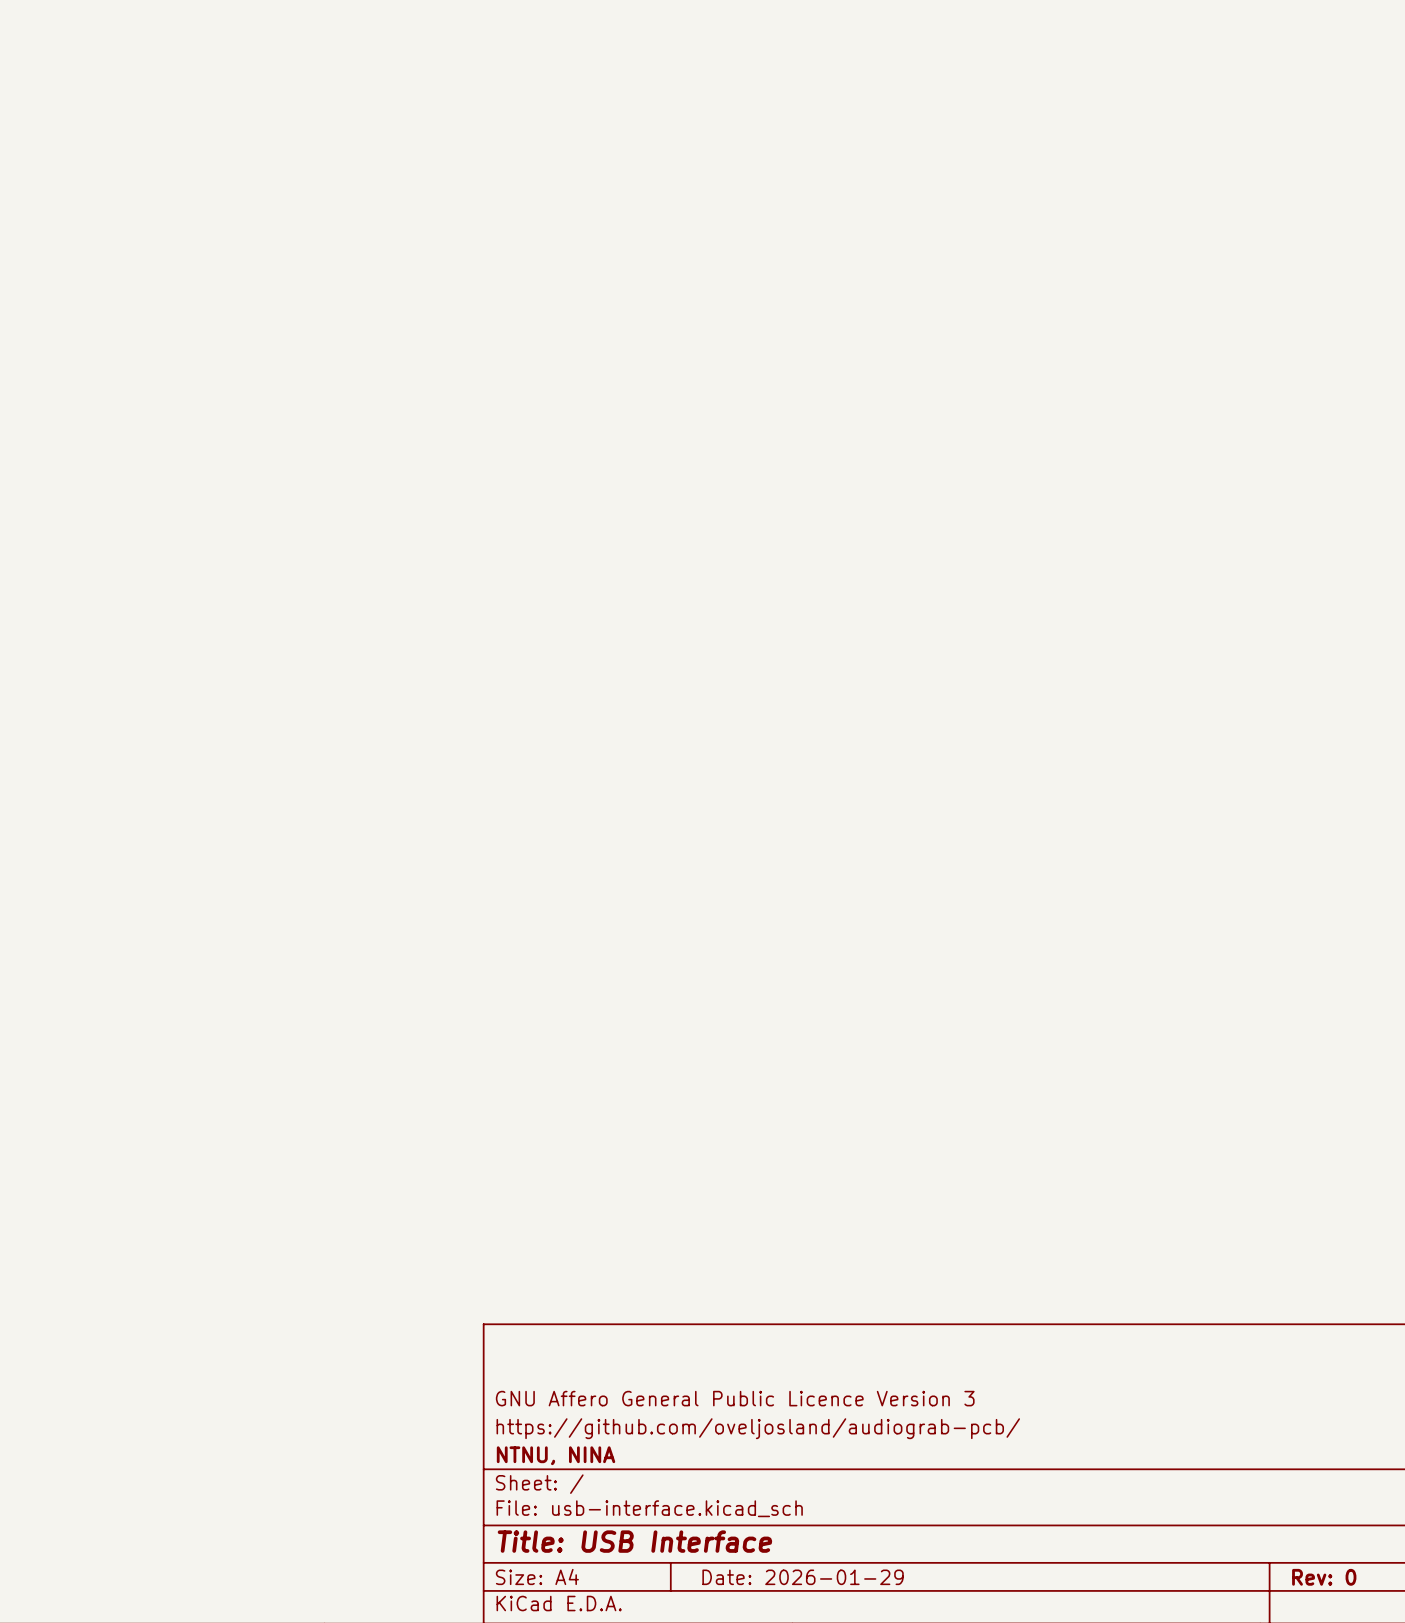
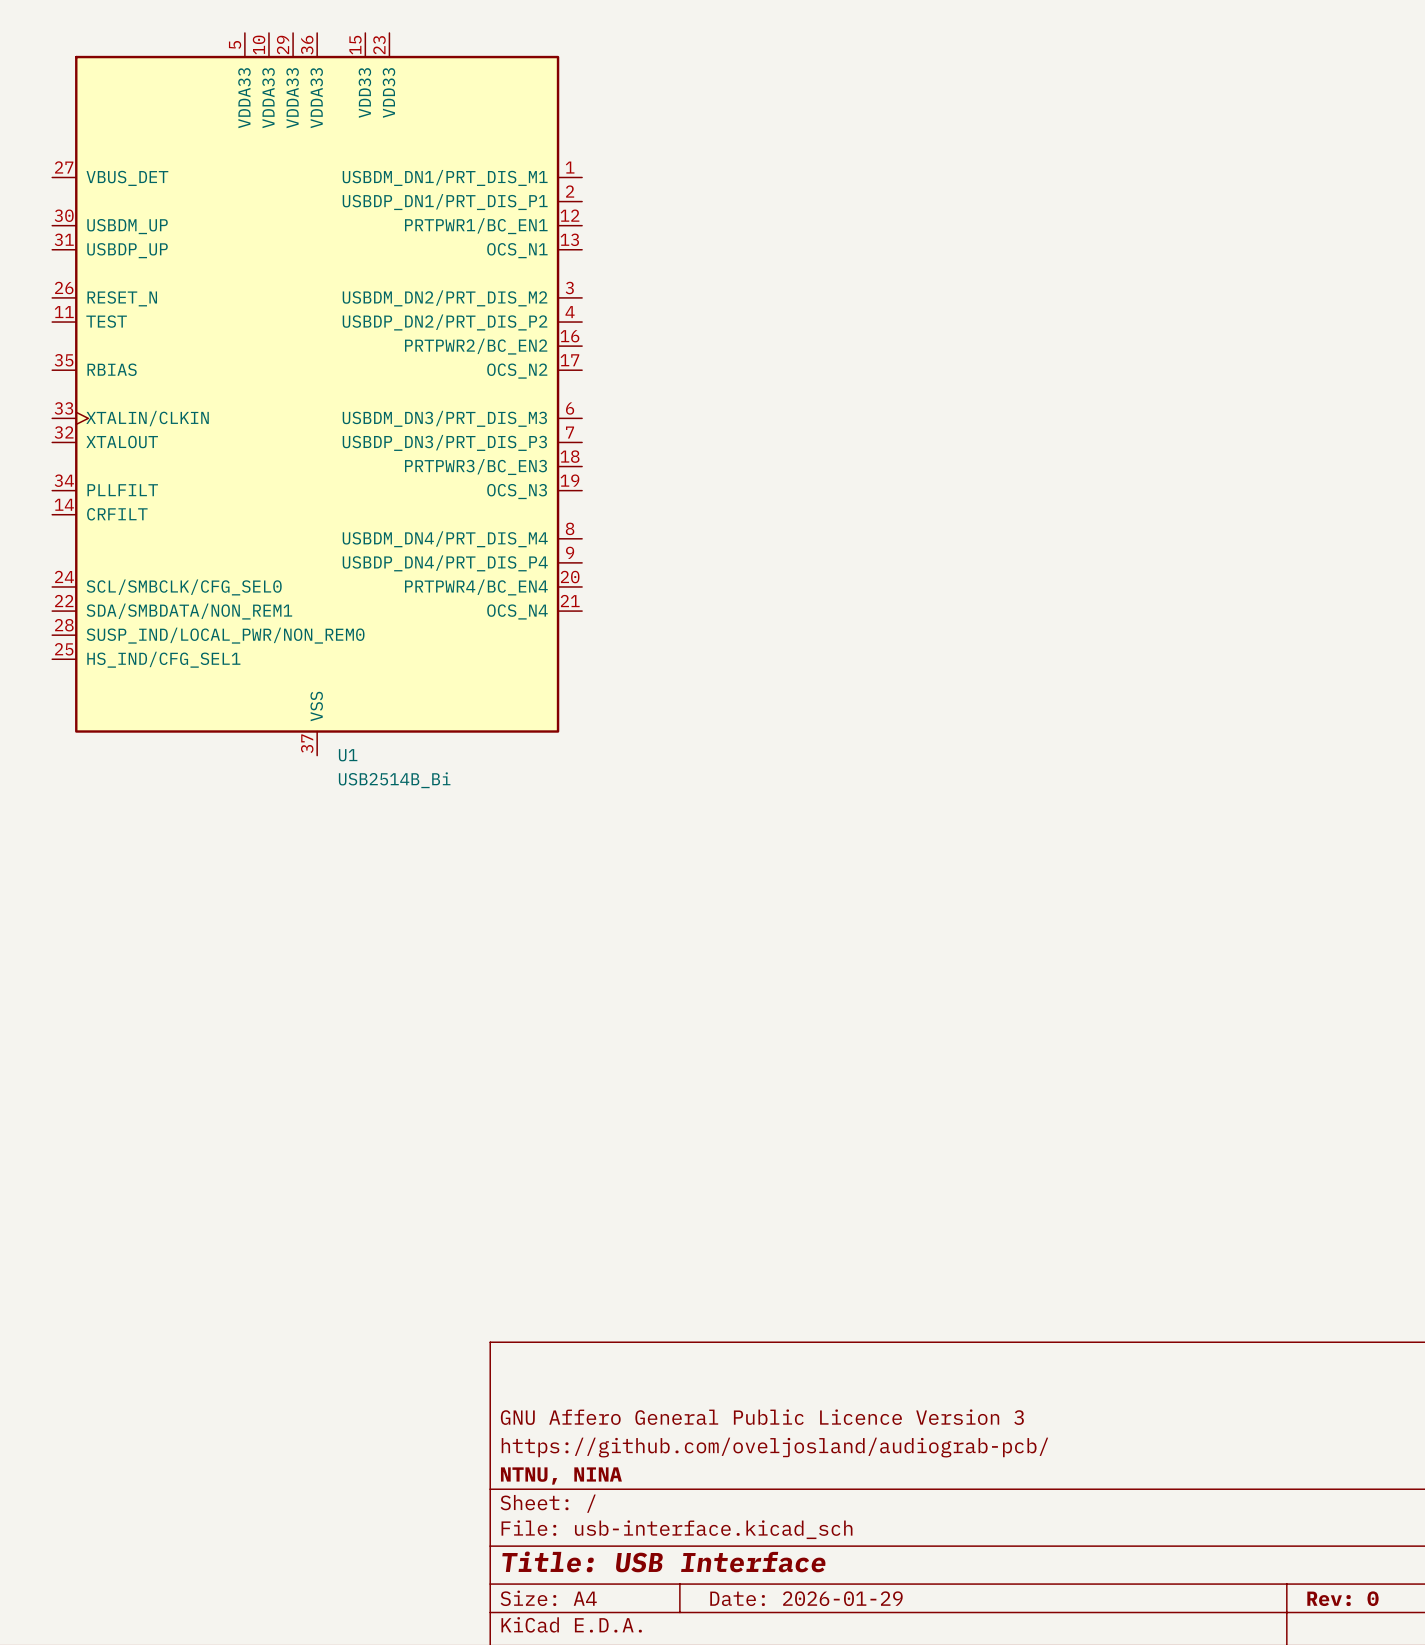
U1: none -> USB2514B_Bi (317, 394)

